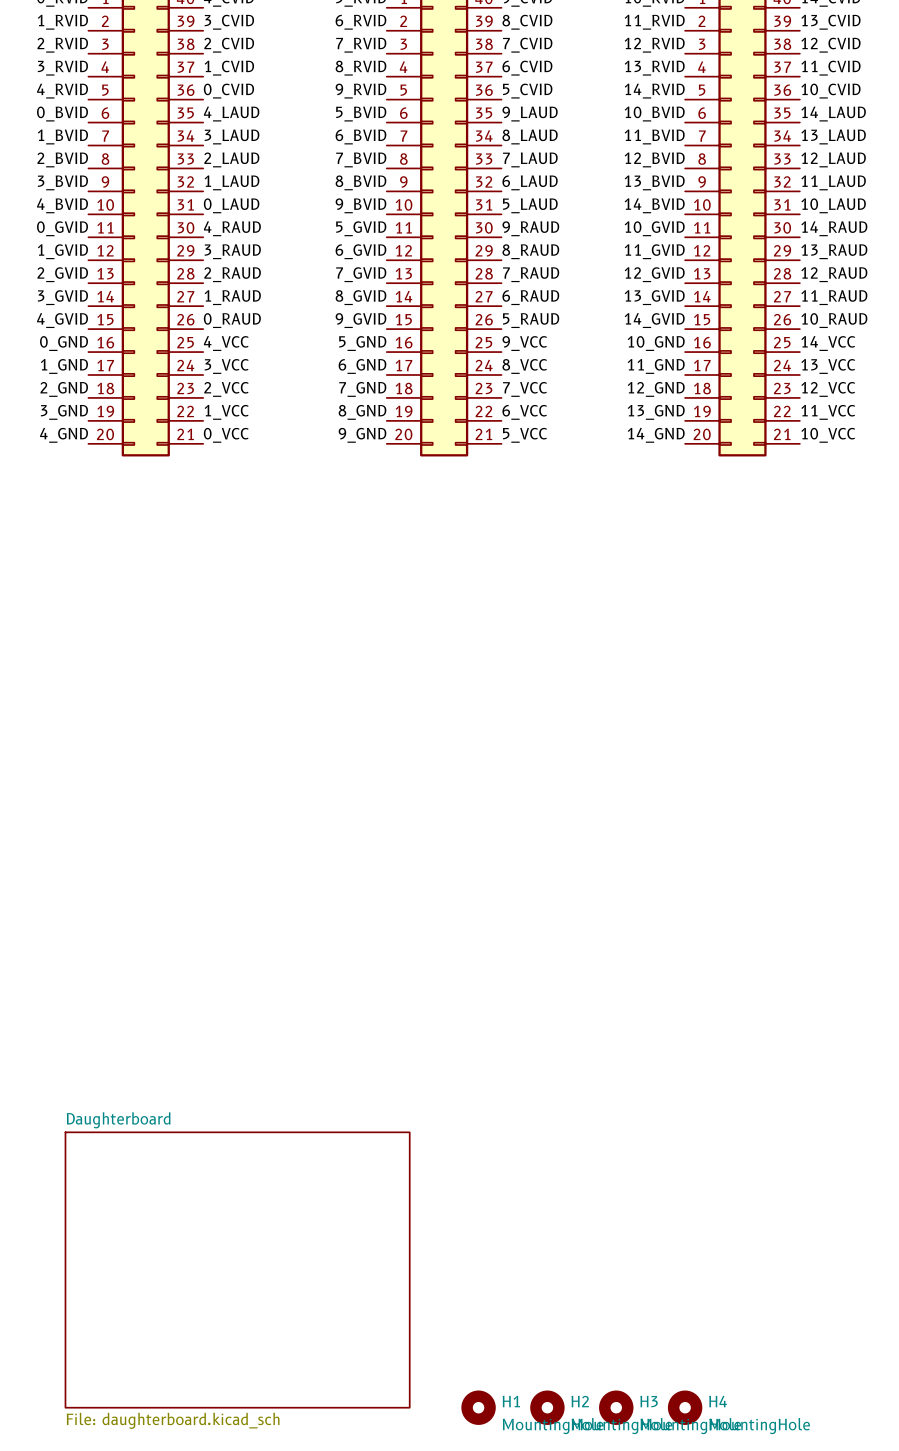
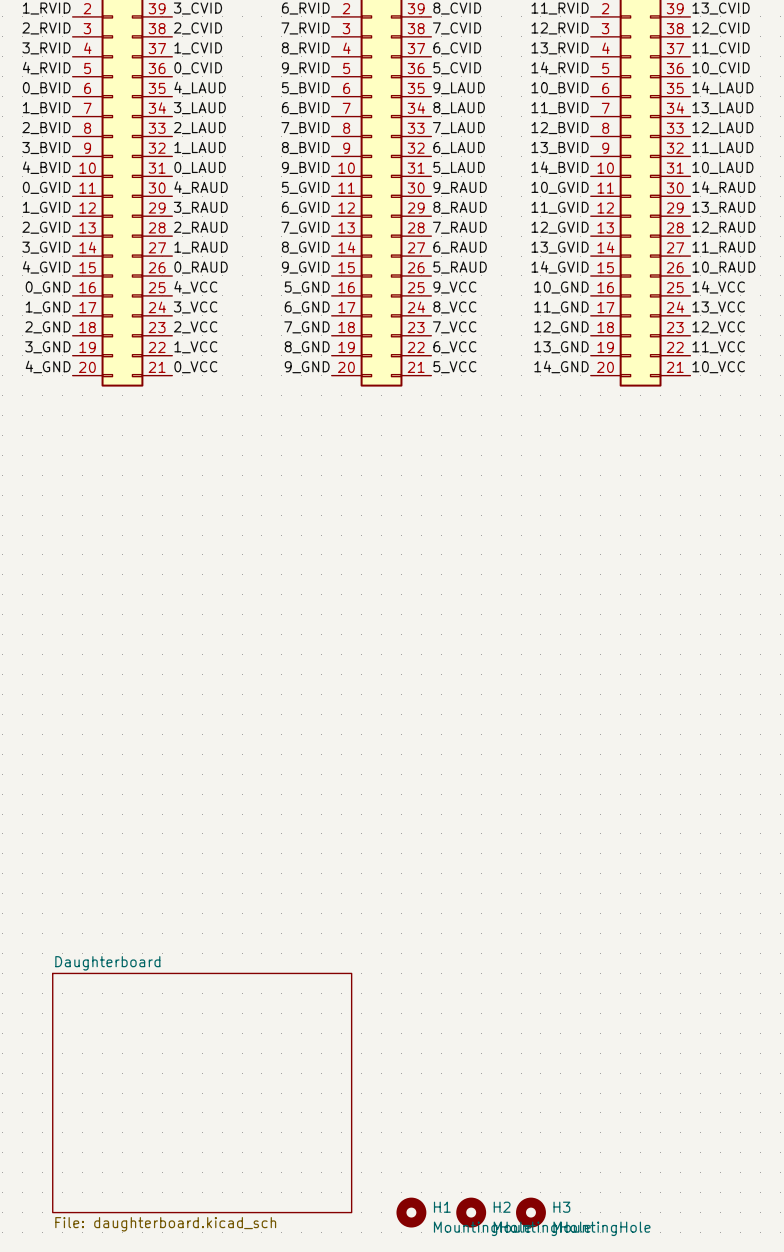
H4: MountingHole (685, 1407) -> none

